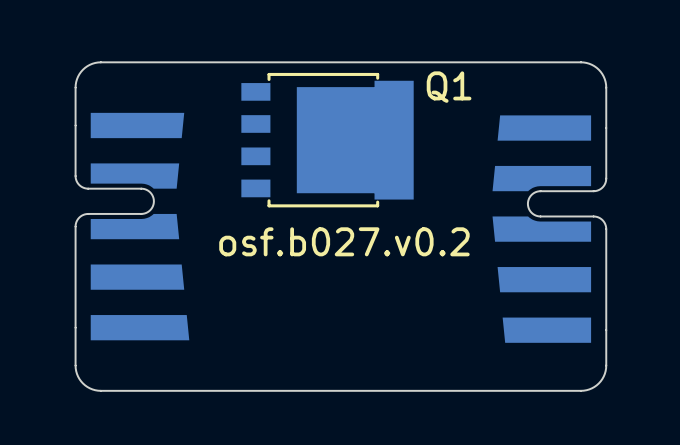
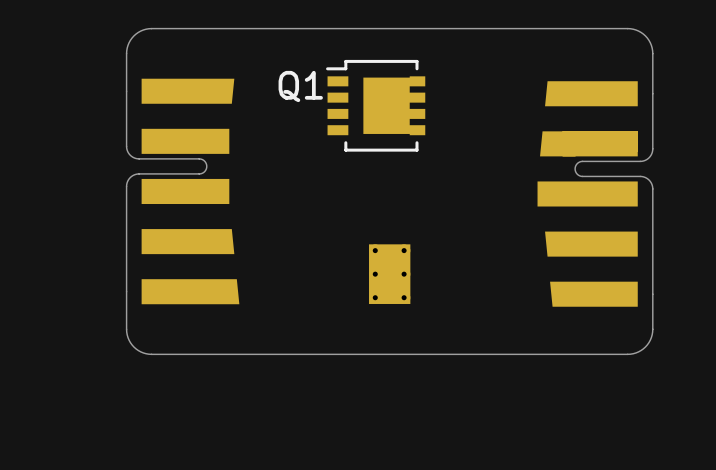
Q1 footprint: [241, 72, 414, 208] -> [326, 59, 426, 152]
Q1 name position: Q1 (449, 87) -> Q1 (300, 86)
part footprint: [74, 112, 190, 341] -> [125, 78, 240, 305]
part footprint: [492, 115, 607, 343] -> [537, 81, 654, 307]
text: osf.b027.v0.2 (344, 241) -> none
part: none -> (389, 274)

